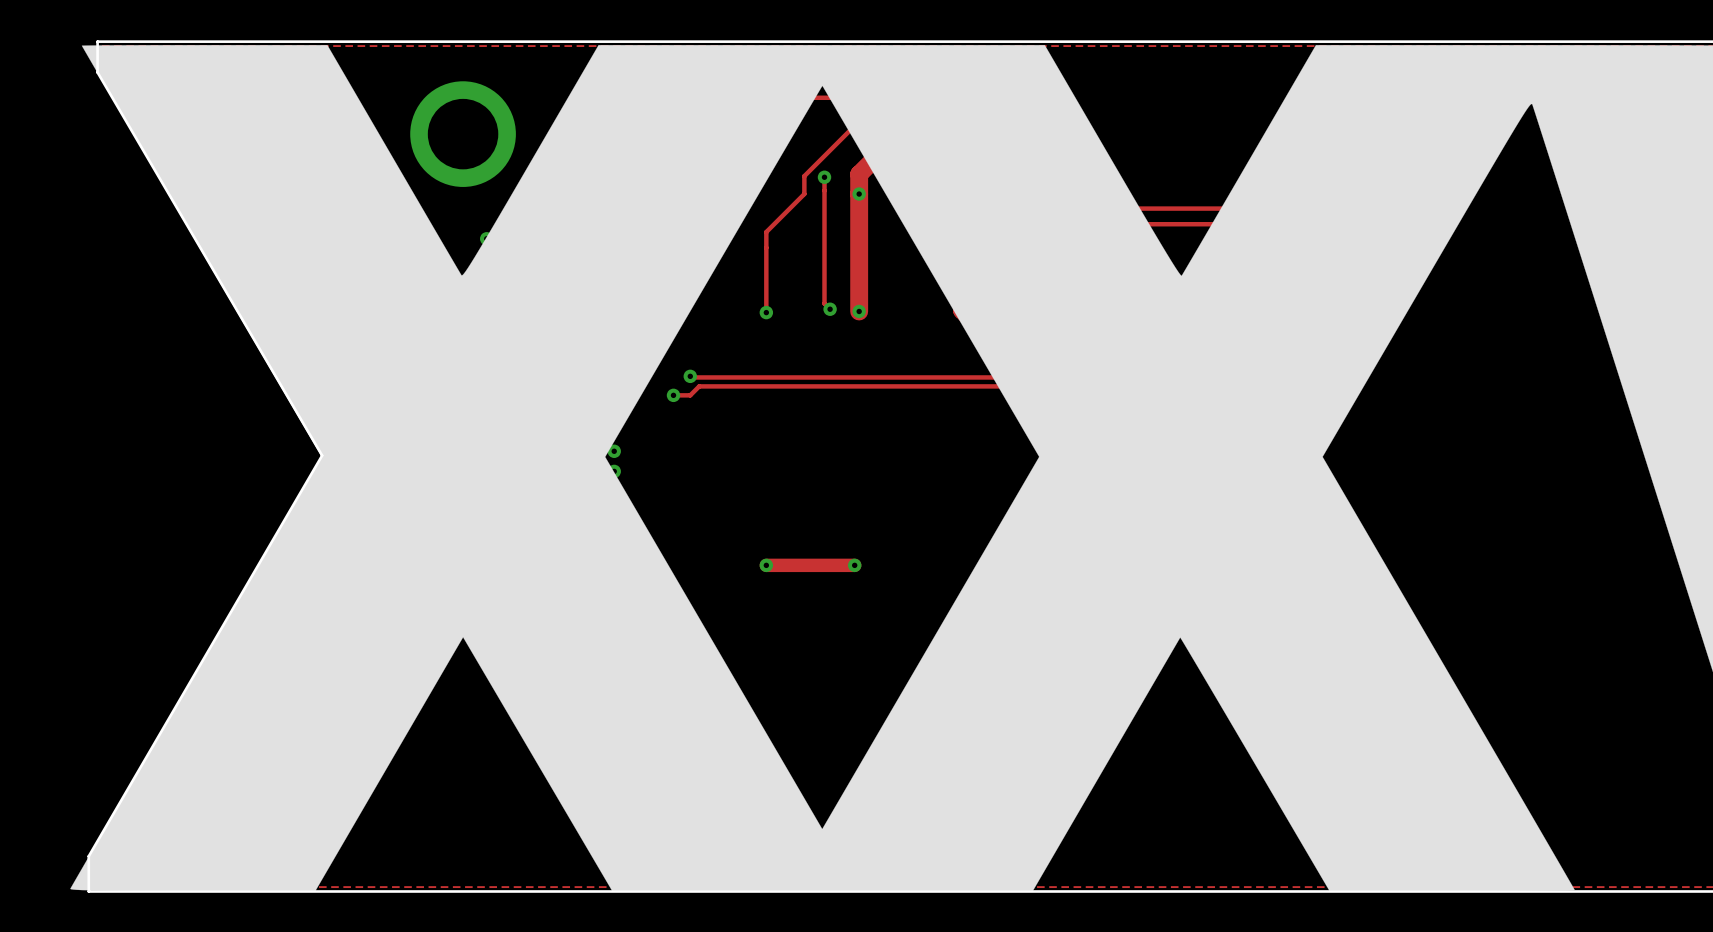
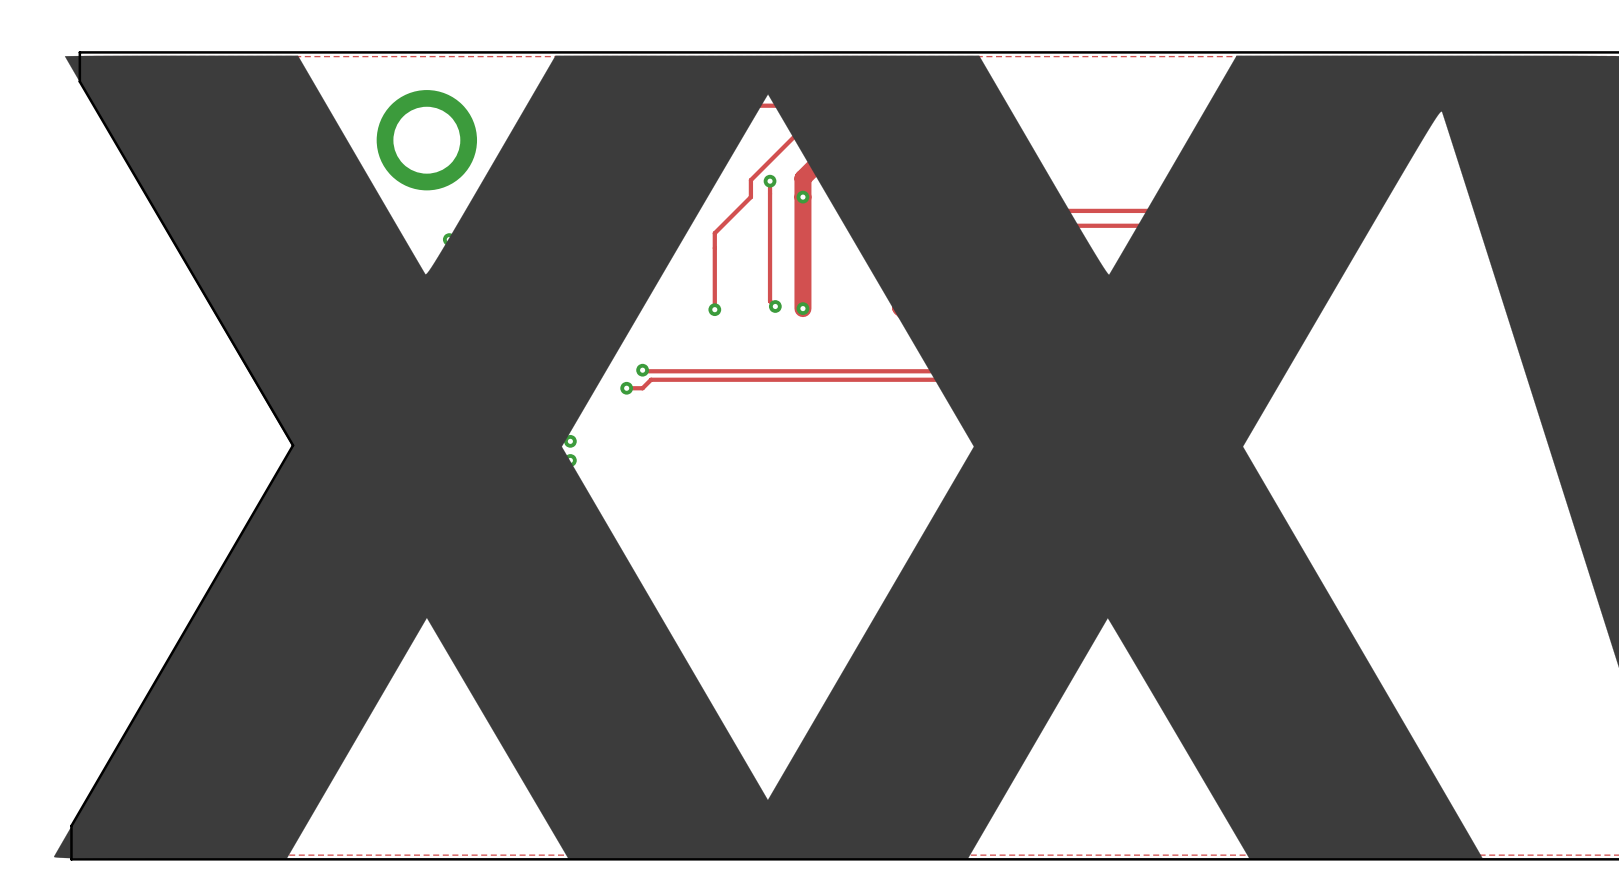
track: (766, 565) (854, 565) -> none
via: (766, 565) -> none
via: (854, 565) -> none

